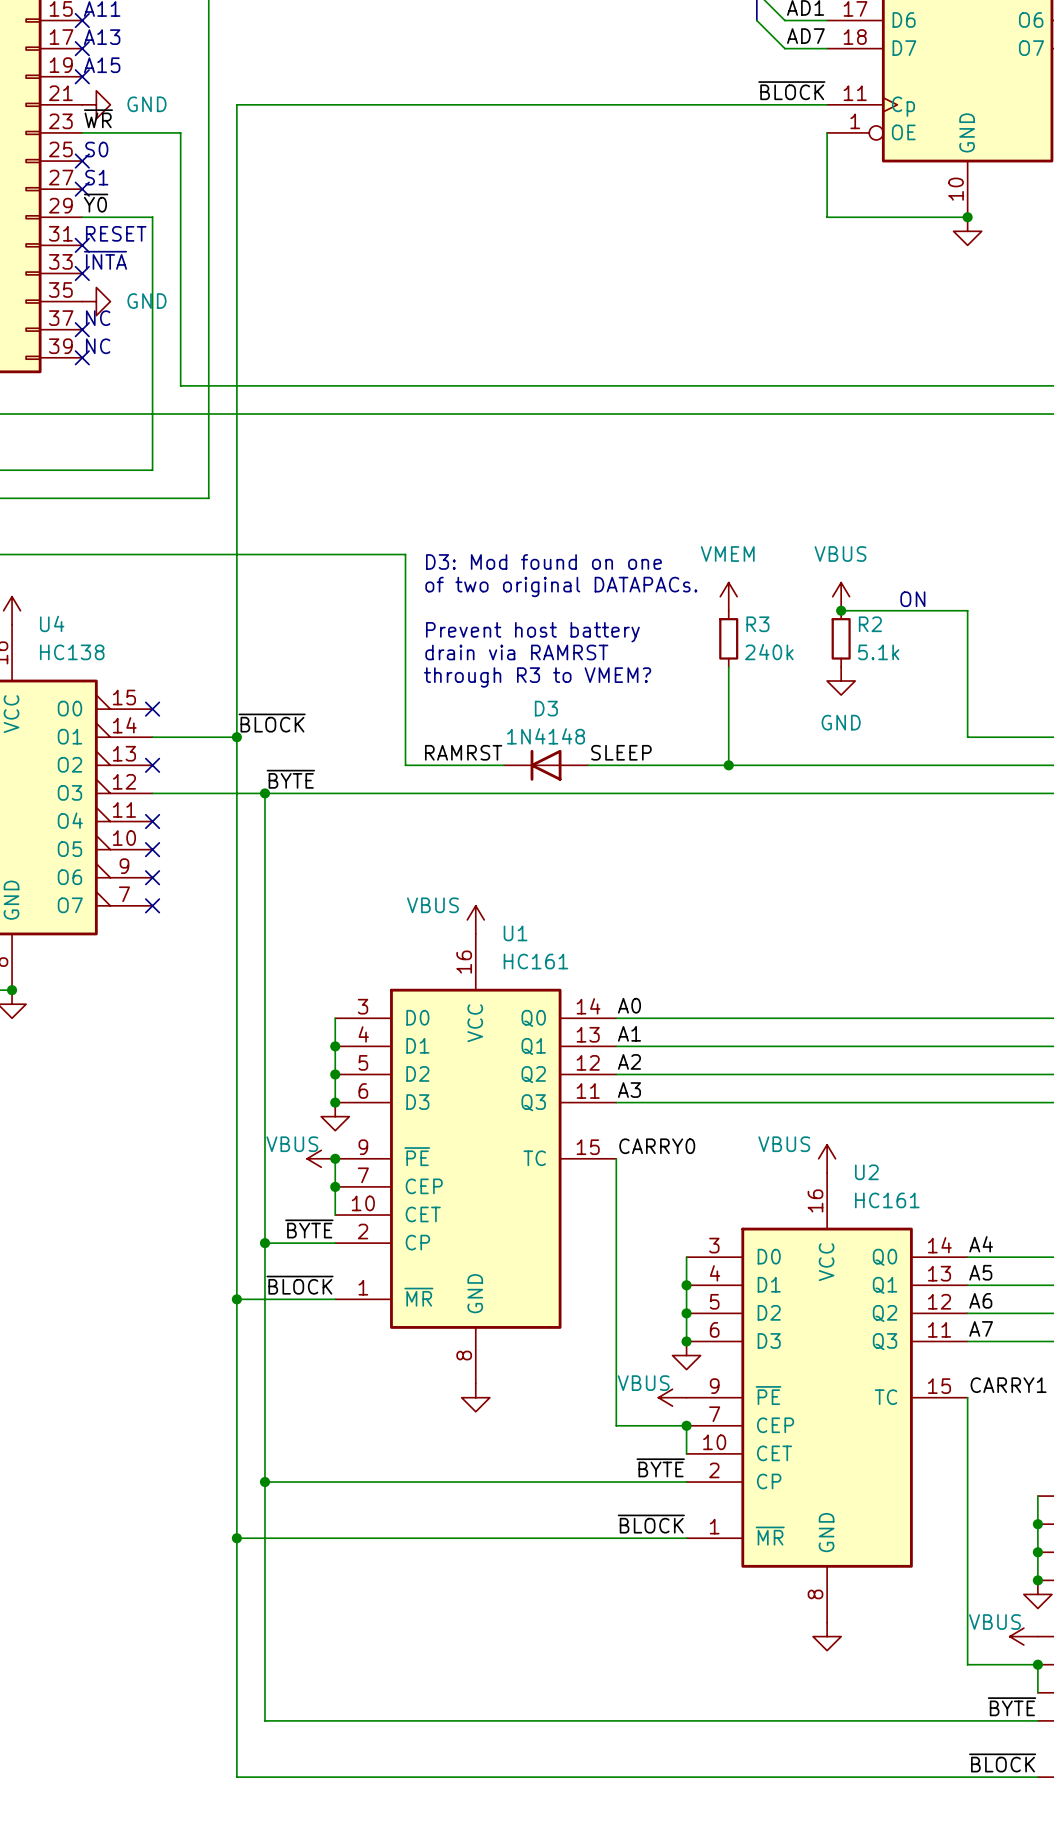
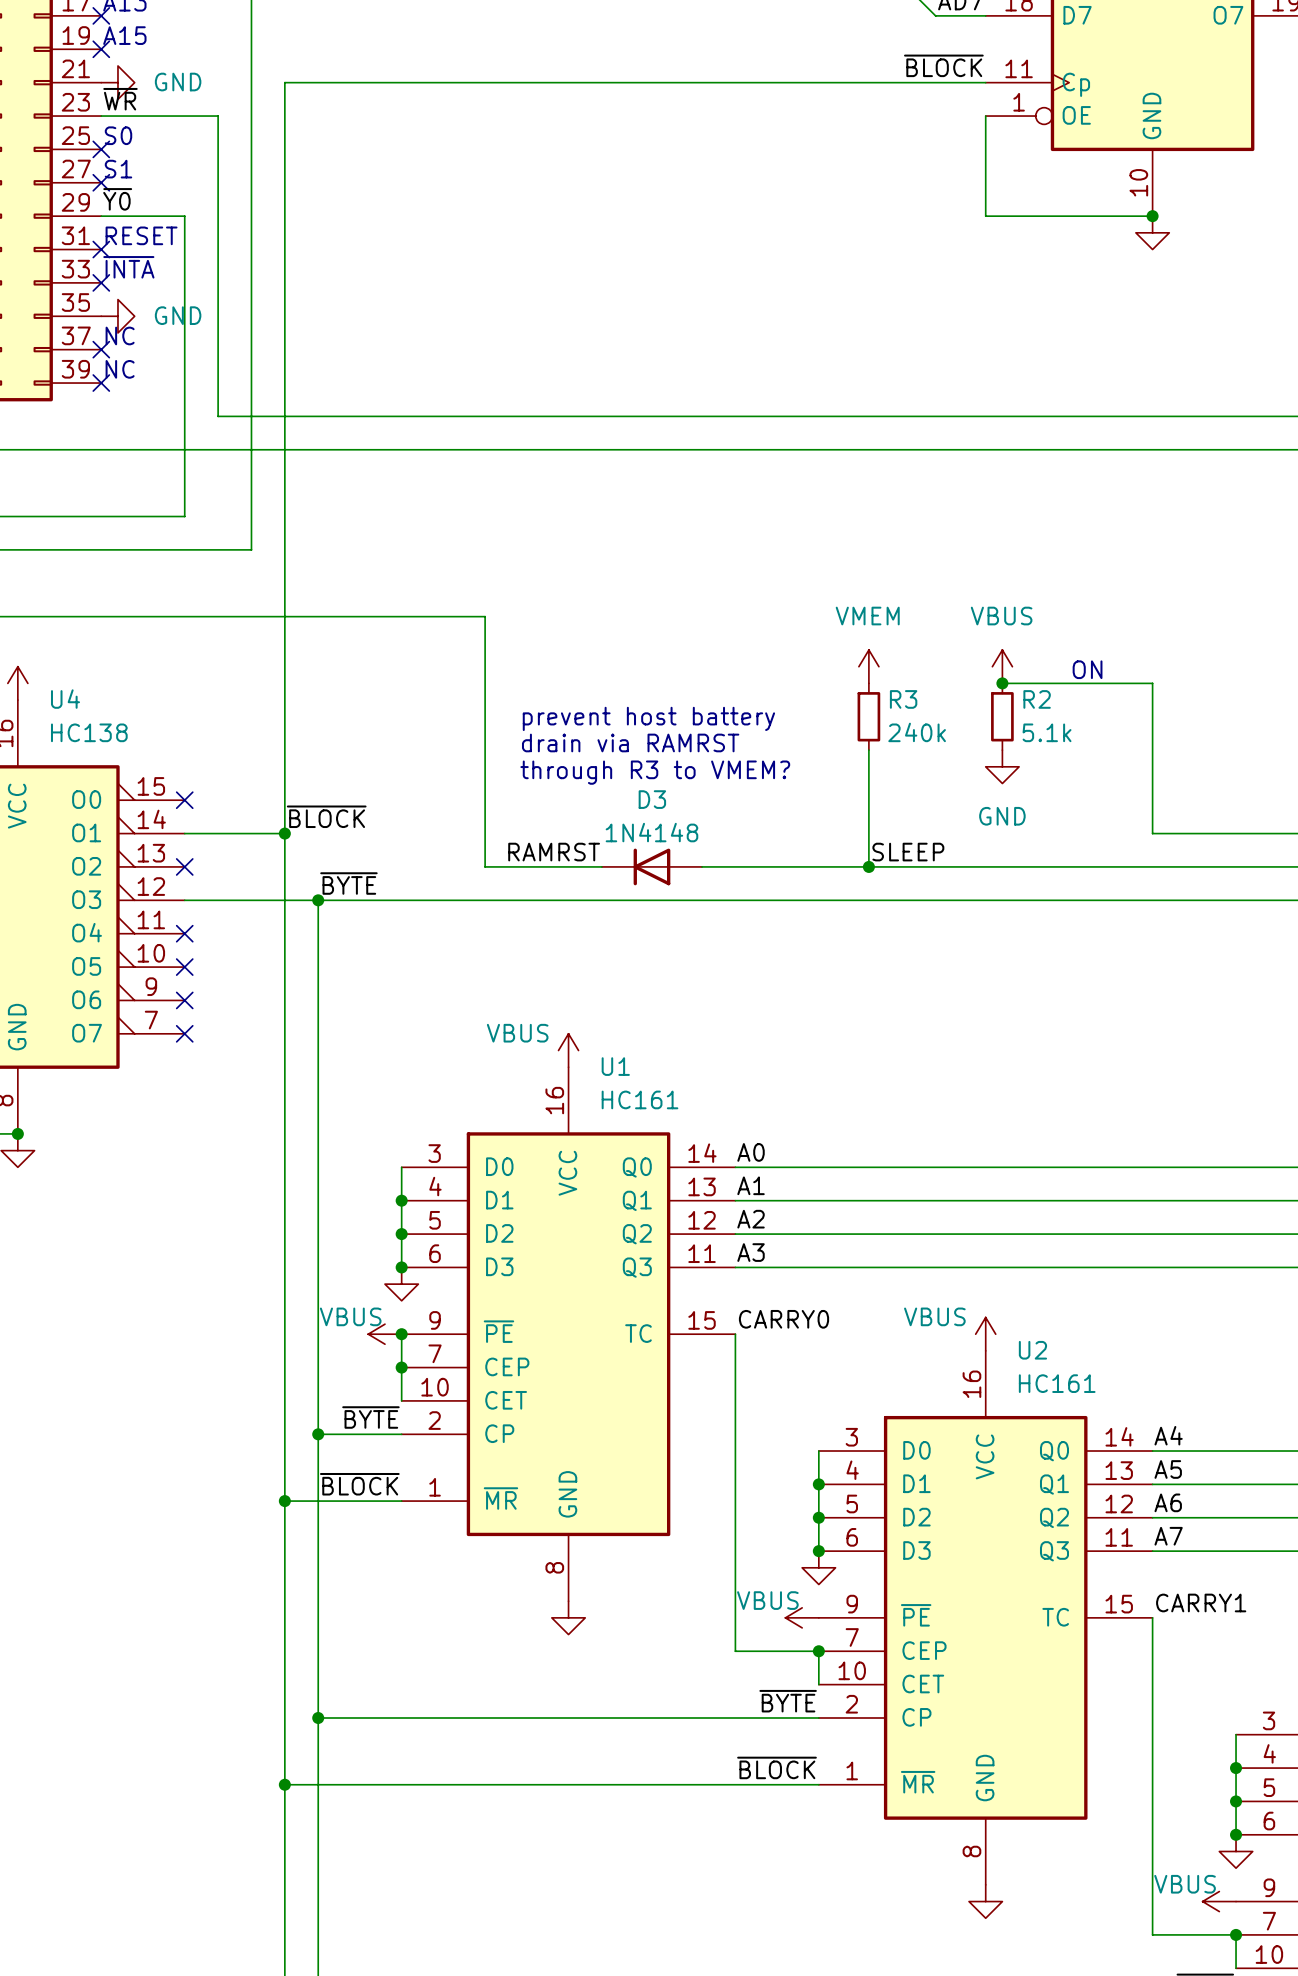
text: D3: Mod found on one (543, 561) -> none
text: of two original DATAPACs. (561, 586) -> none
text: Prevent host battery (532, 632) -> prevent host battery (648, 718)
text position: drain via RAMRST (516, 652) -> drain via RAMRST (630, 742)
text position: through R3 to VMEM? (537, 677) -> through R3 to VMEM? (655, 772)
label position: SLEEP (621, 752) -> SLEEP (908, 852)

